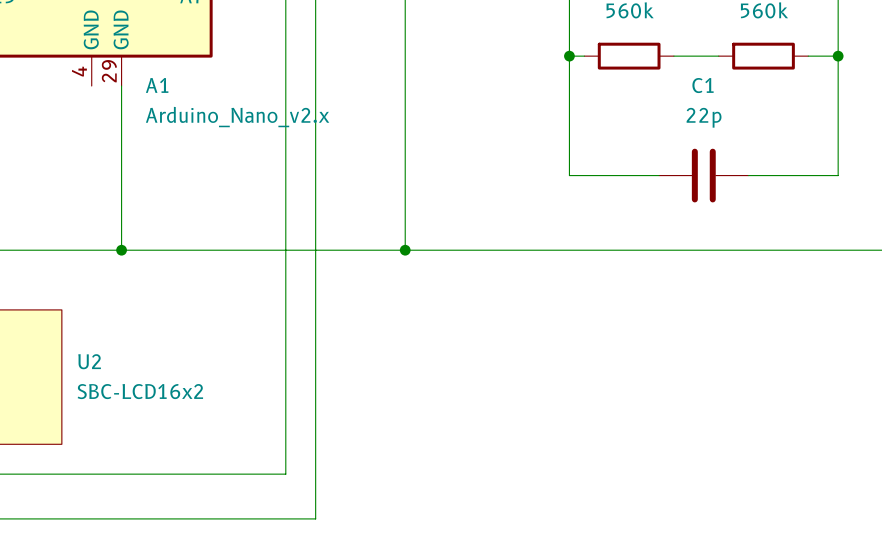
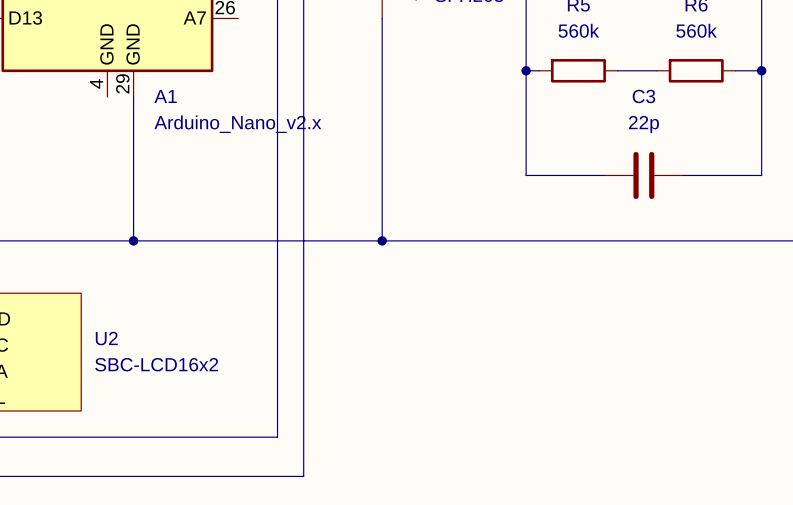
C1 name: C1 (703, 85) -> C3 (643, 96)

